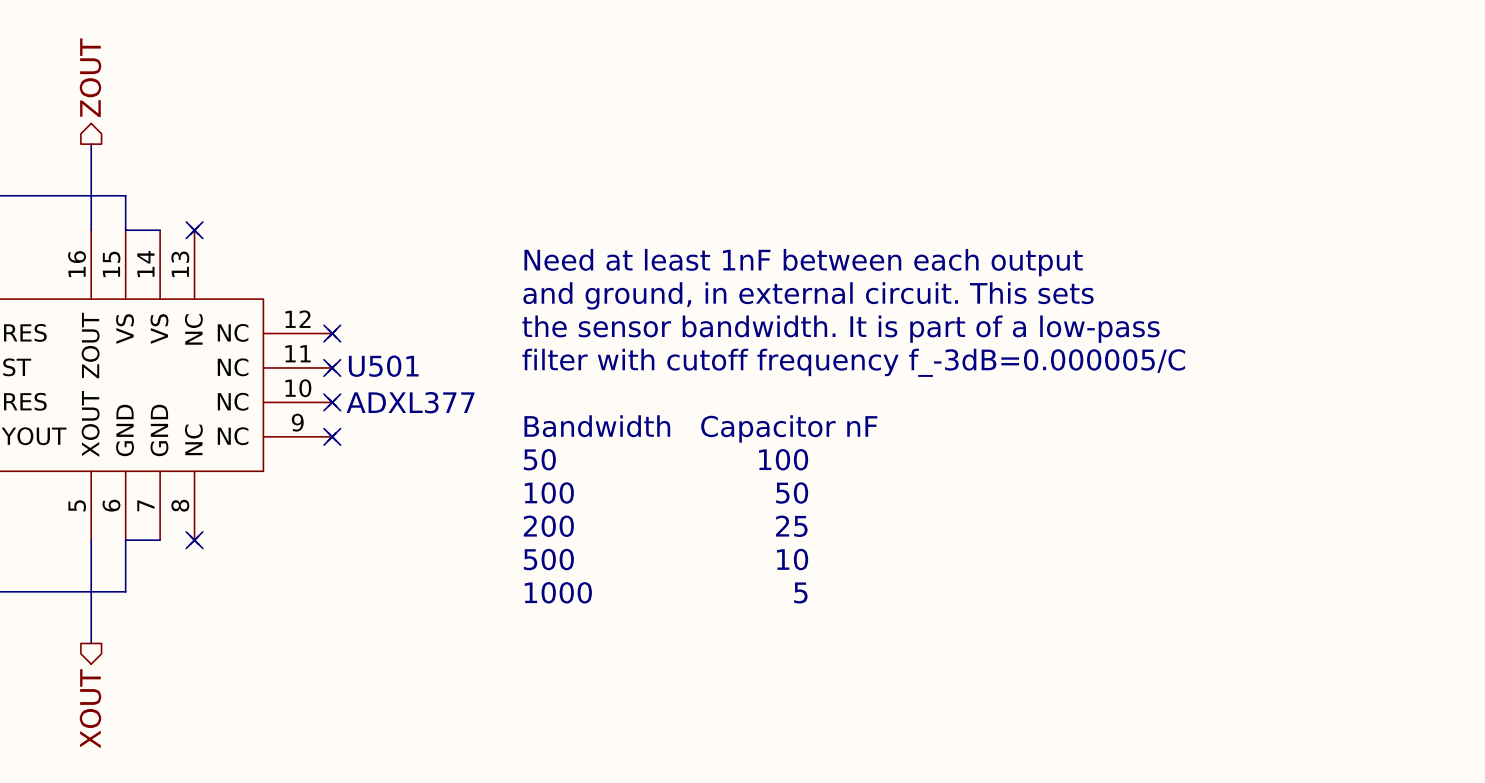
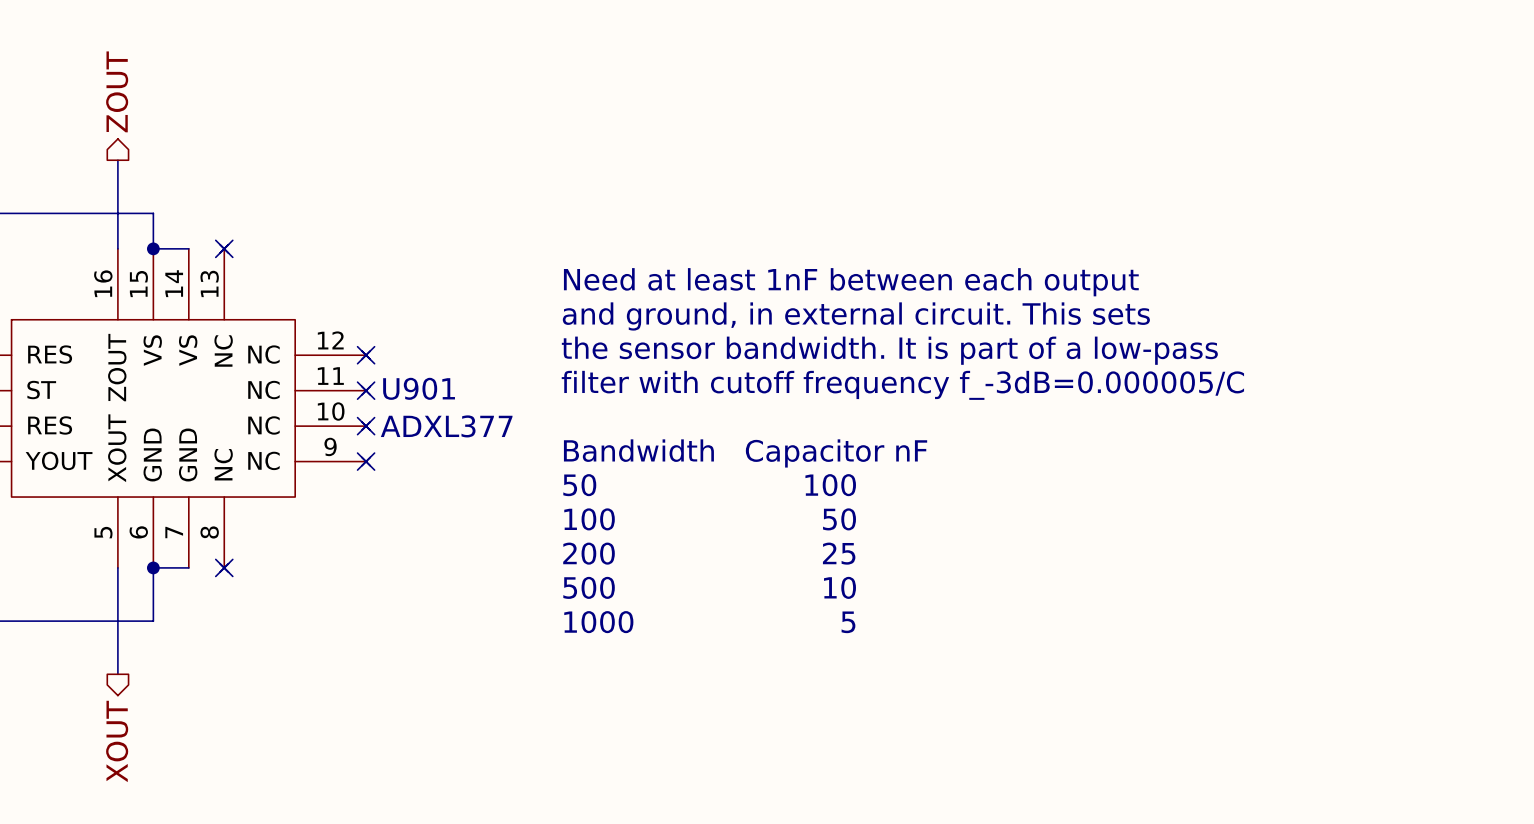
junction: none -> (153, 248)
U501 name: U501 (383, 366) -> U901 (419, 388)
junction: none -> (153, 567)

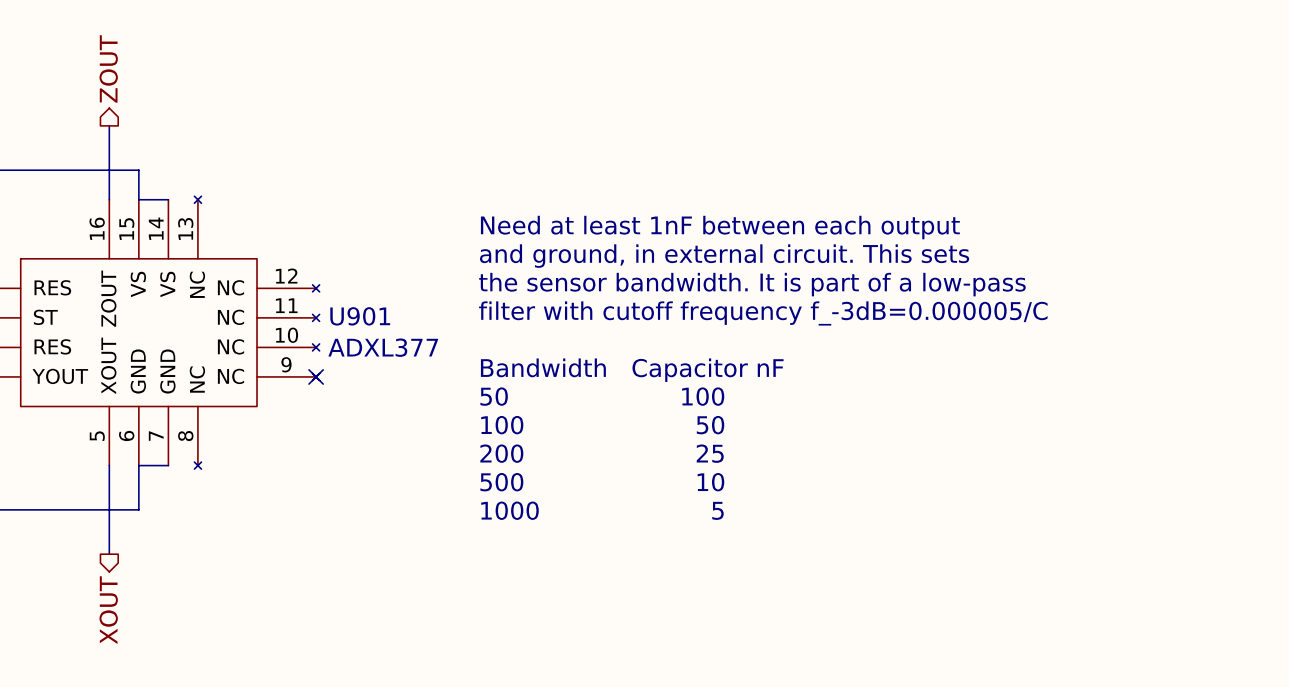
junction: (153, 248) -> none
no-connect mark: (224, 248) -> none
no-connect mark: (366, 355) -> none
no-connect mark: (366, 390) -> none
no-connect mark: (366, 426) -> none
junction: (153, 567) -> none
no-connect mark: (224, 567) -> none

